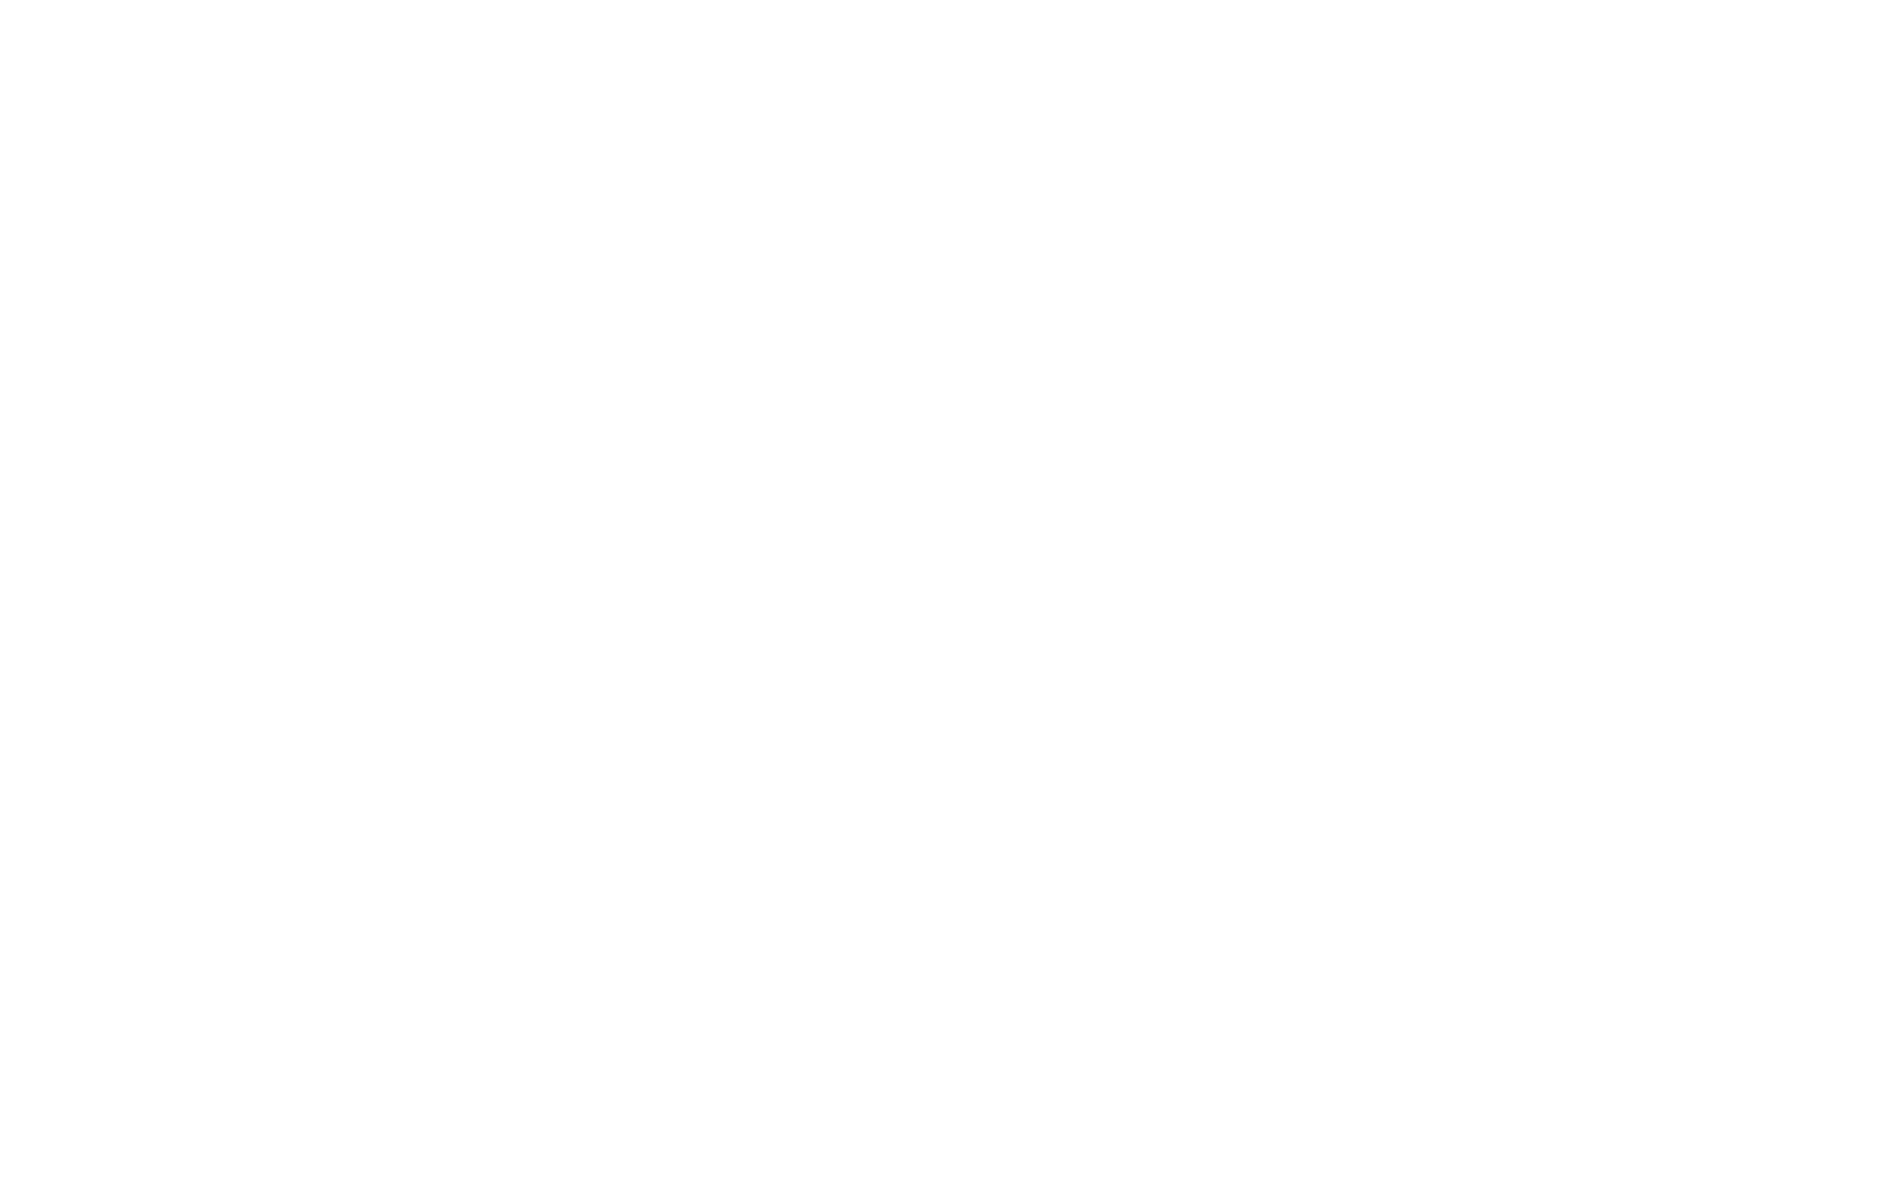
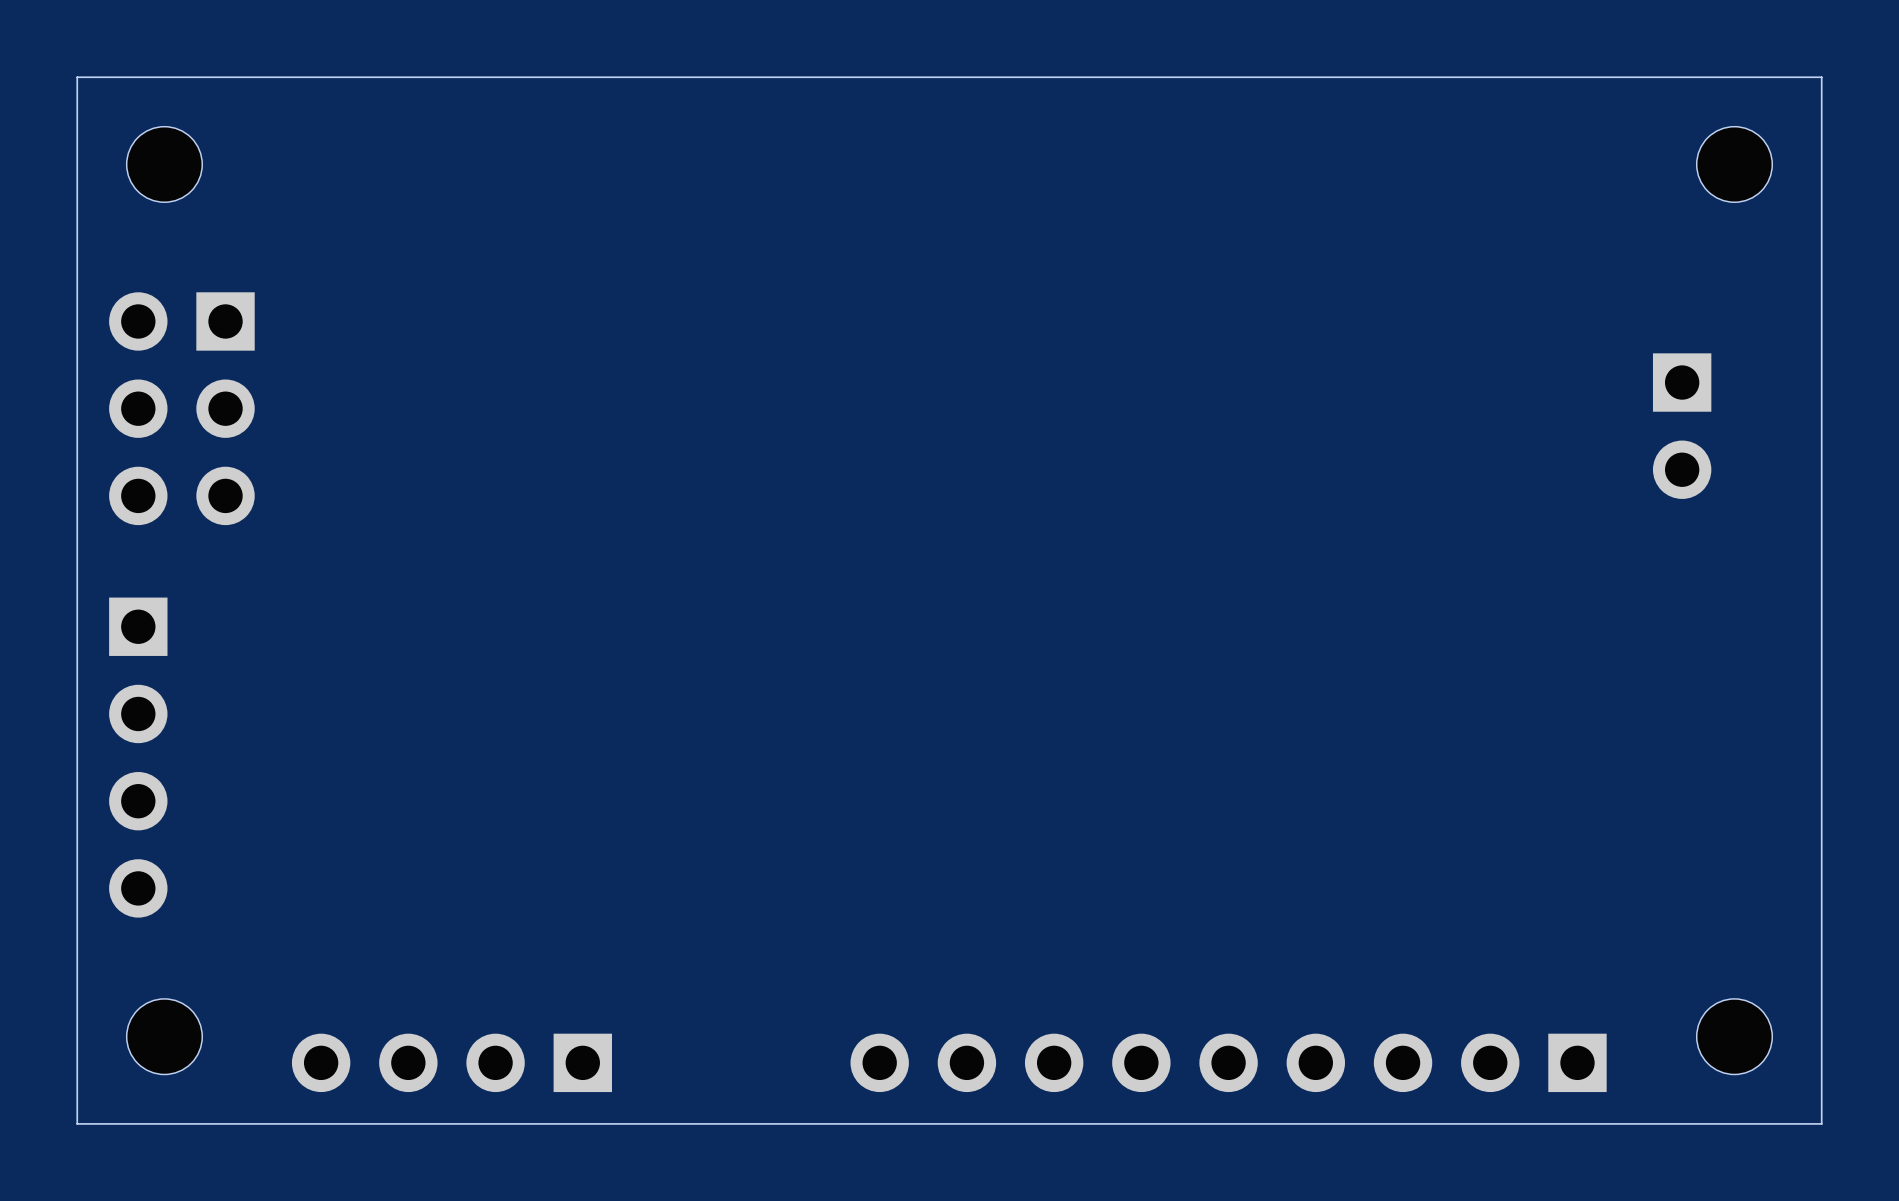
board edge: none -> (1821, 77) (77, 77) (77, 1123) (1821, 1123) (1821, 77)
part: none -> (164, 164)
part: none -> (1734, 164)
part: none -> (181, 408)
part: none -> (1682, 426)
part: none -> (138, 757)
part: none -> (164, 1036)
part: none -> (1734, 1036)
part: none -> (451, 1062)
part: none -> (1228, 1062)

